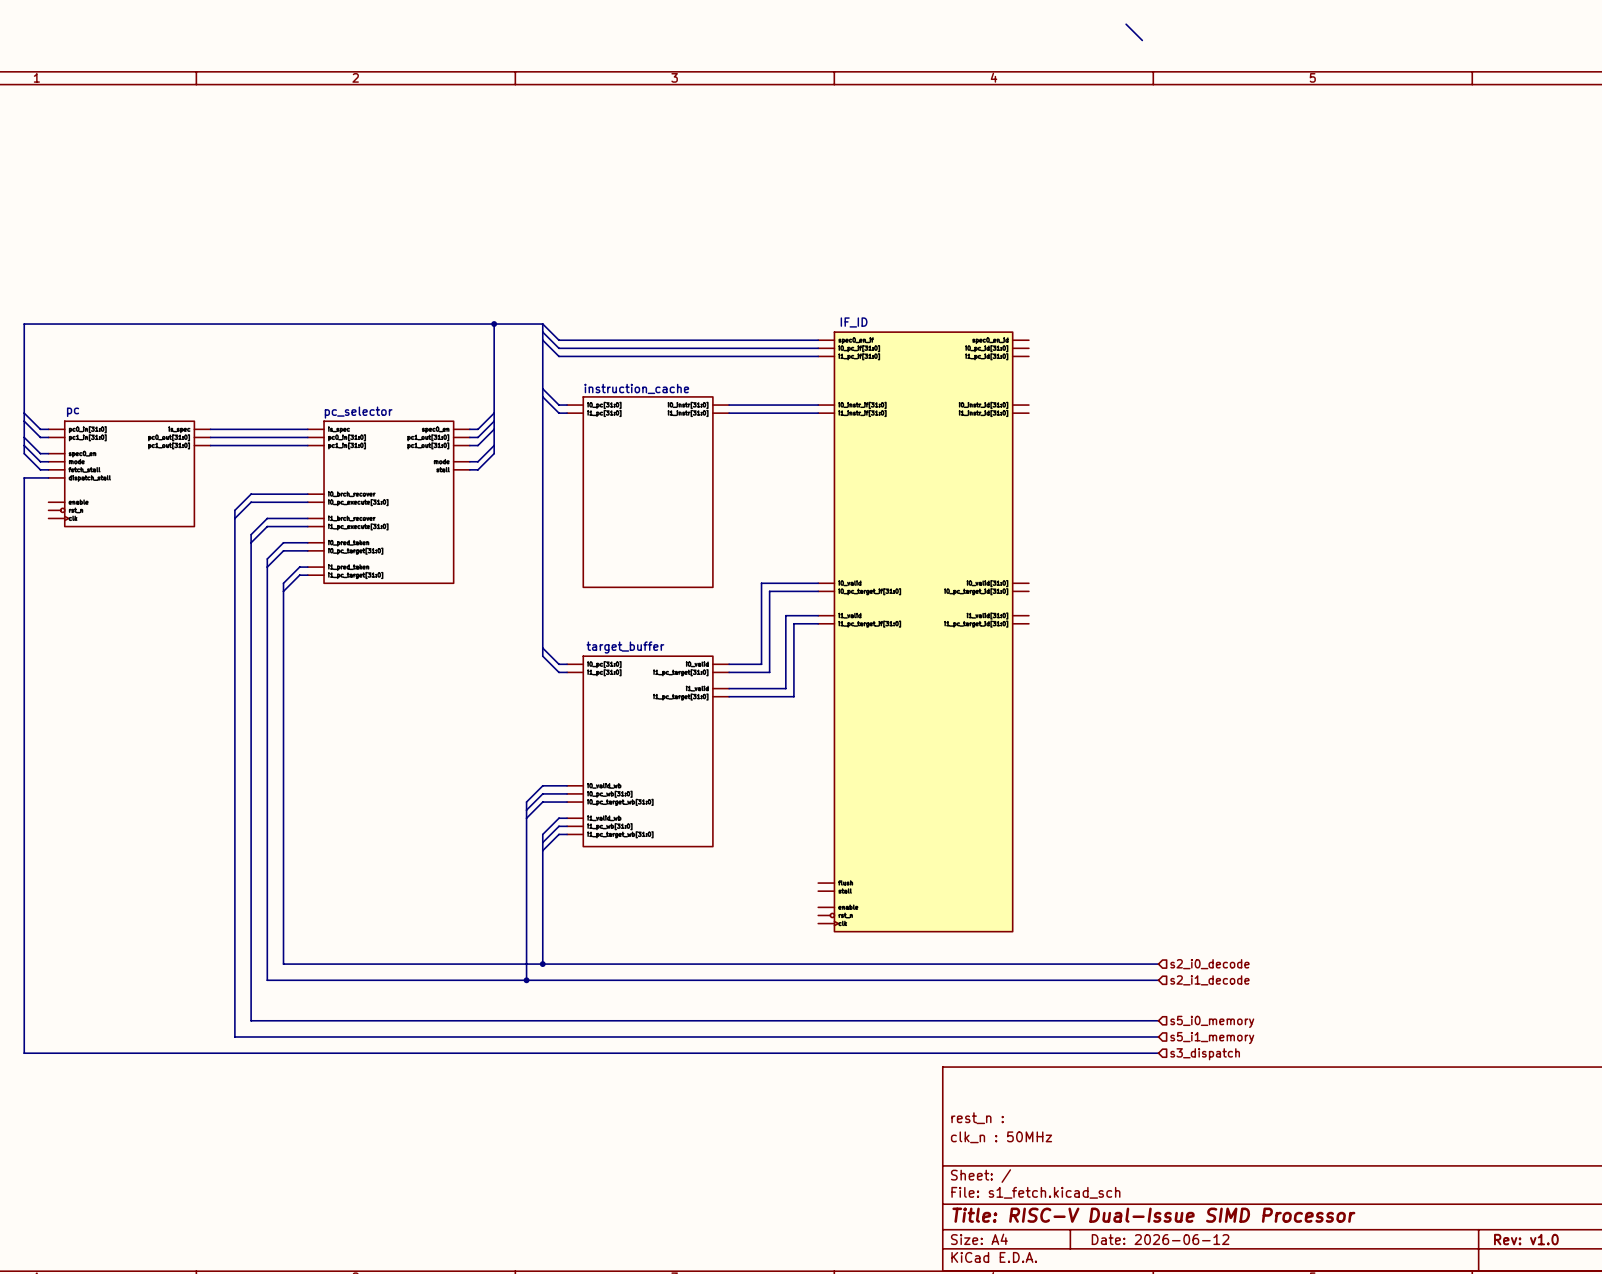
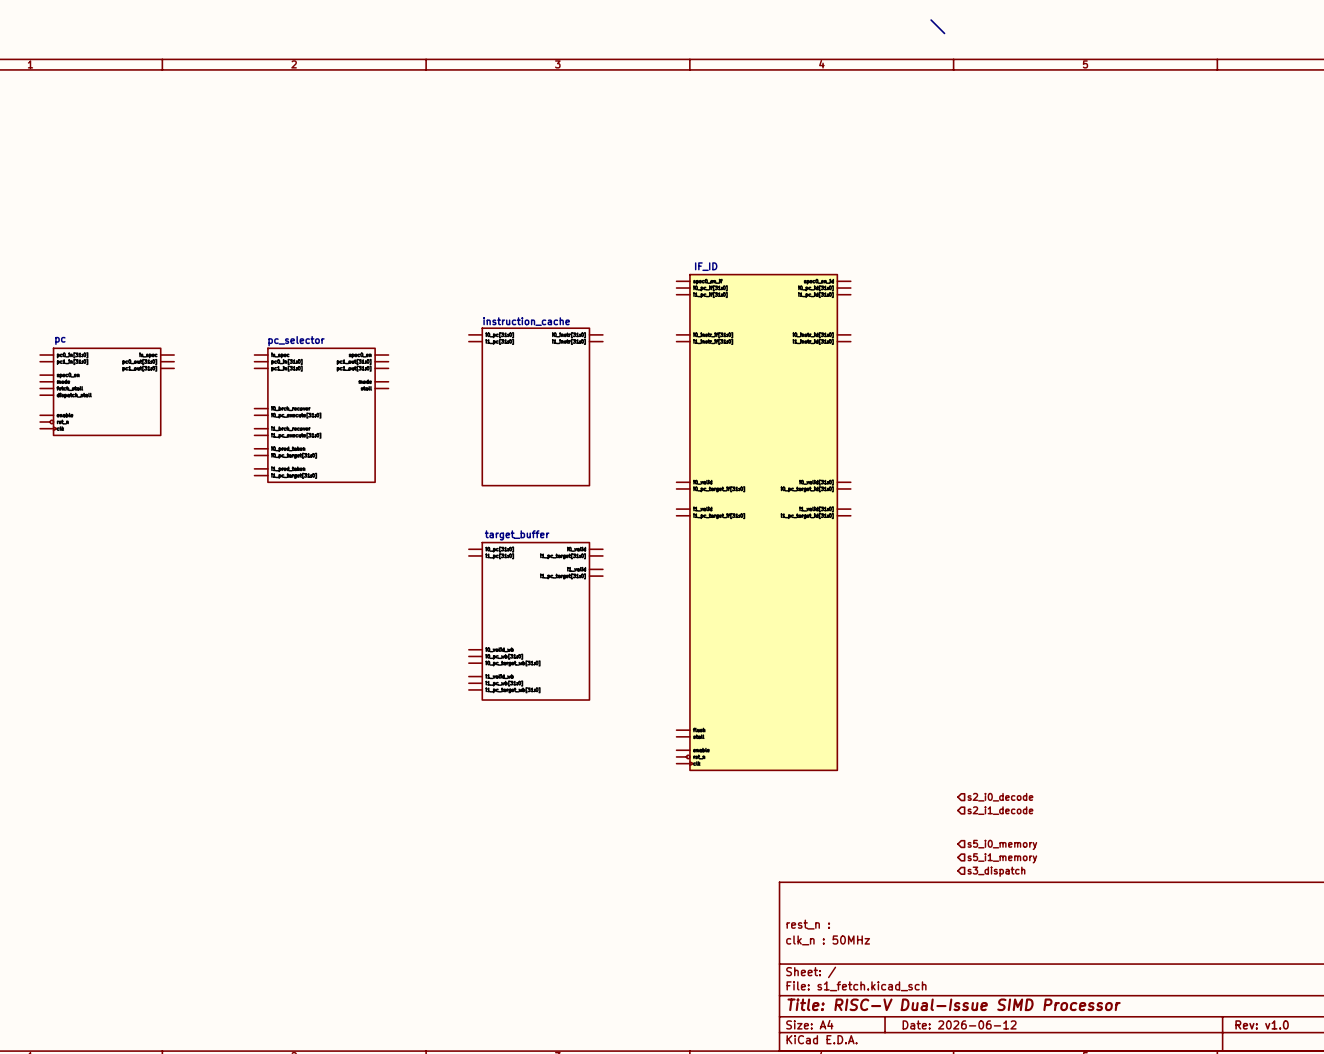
bus: (494, 324) (494, 453) -> none
junction: (494, 324) -> none
wire: (542, 324) (558, 340) (818, 340) -> none
wire: (542, 332) (558, 348) (818, 348) -> none
wire: (542, 340) (558, 356) (818, 356) -> none
wire: (542, 388) (558, 405) (567, 405) -> none
wire: (542, 396) (558, 413) (567, 413) -> none
wire: (729, 405) (818, 405) -> none
wire: (24, 413) (40, 429) (48, 429) -> none
wire: (494, 413) (477, 429) (469, 429) -> none
wire: (729, 413) (818, 413) -> none
wire: (24, 421) (40, 437) (48, 437) -> none
wire: (494, 421) (477, 437) (469, 437) -> none
wire: (210, 429) (307, 429) -> none
wire: (494, 429) (477, 445) (469, 445) -> none
wire: (24, 437) (40, 453) (48, 453) -> none
wire: (210, 437) (307, 437) -> none
wire: (24, 445) (40, 461) (48, 461) -> none
wire: (210, 445) (307, 445) -> none
wire: (494, 445) (477, 461) (469, 461) -> none
wire: (24, 453) (40, 469) (48, 469) -> none
bus: (24, 453) (24, 324) (542, 324) (542, 656) -> none
wire: (494, 453) (477, 469) (469, 469) -> none
wire: (48, 477) (24, 477) (24, 1053) (1158, 1053) -> none
wire: (307, 494) (251, 494) (234, 510) -> none
wire: (307, 502) (251, 502) (234, 518) -> none
bus: (234, 510) (234, 1036) (1158, 1036) -> none
wire: (307, 518) (267, 518) (251, 534) -> none
wire: (307, 526) (267, 526) (251, 542) -> none
bus: (251, 534) (251, 1020) (1158, 1020) -> none
wire: (307, 542) (283, 542) (267, 558) -> none
wire: (307, 550) (283, 550) (267, 567) -> none
bus: (267, 558) (267, 980) (1158, 980) -> none
wire: (307, 567) (299, 567) (283, 583) -> none
wire: (307, 575) (299, 575) (283, 591) -> none
bus: (283, 583) (283, 964) (1158, 964) -> none
wire: (818, 583) (761, 583) (761, 664) (729, 664) -> none
wire: (818, 591) (769, 591) (769, 672) (729, 672) -> none
wire: (818, 615) (785, 615) (785, 688) (729, 688) -> none
wire: (818, 623) (793, 623) (793, 696) (729, 696) -> none
wire: (542, 648) (558, 664) (567, 664) -> none
wire: (542, 656) (558, 672) (567, 672) -> none
wire: (567, 785) (542, 785) (526, 802) -> none
wire: (567, 793) (542, 793) (526, 810) -> none
bus: (526, 802) (526, 980) -> none
wire: (567, 802) (542, 802) (526, 818) -> none
wire: (567, 818) (558, 818) (542, 834) -> none
wire: (567, 826) (558, 826) (542, 842) -> none
bus: (542, 834) (542, 964) -> none
wire: (567, 834) (558, 834) (542, 850) -> none
junction: (542, 964) -> none
junction: (526, 980) -> none

